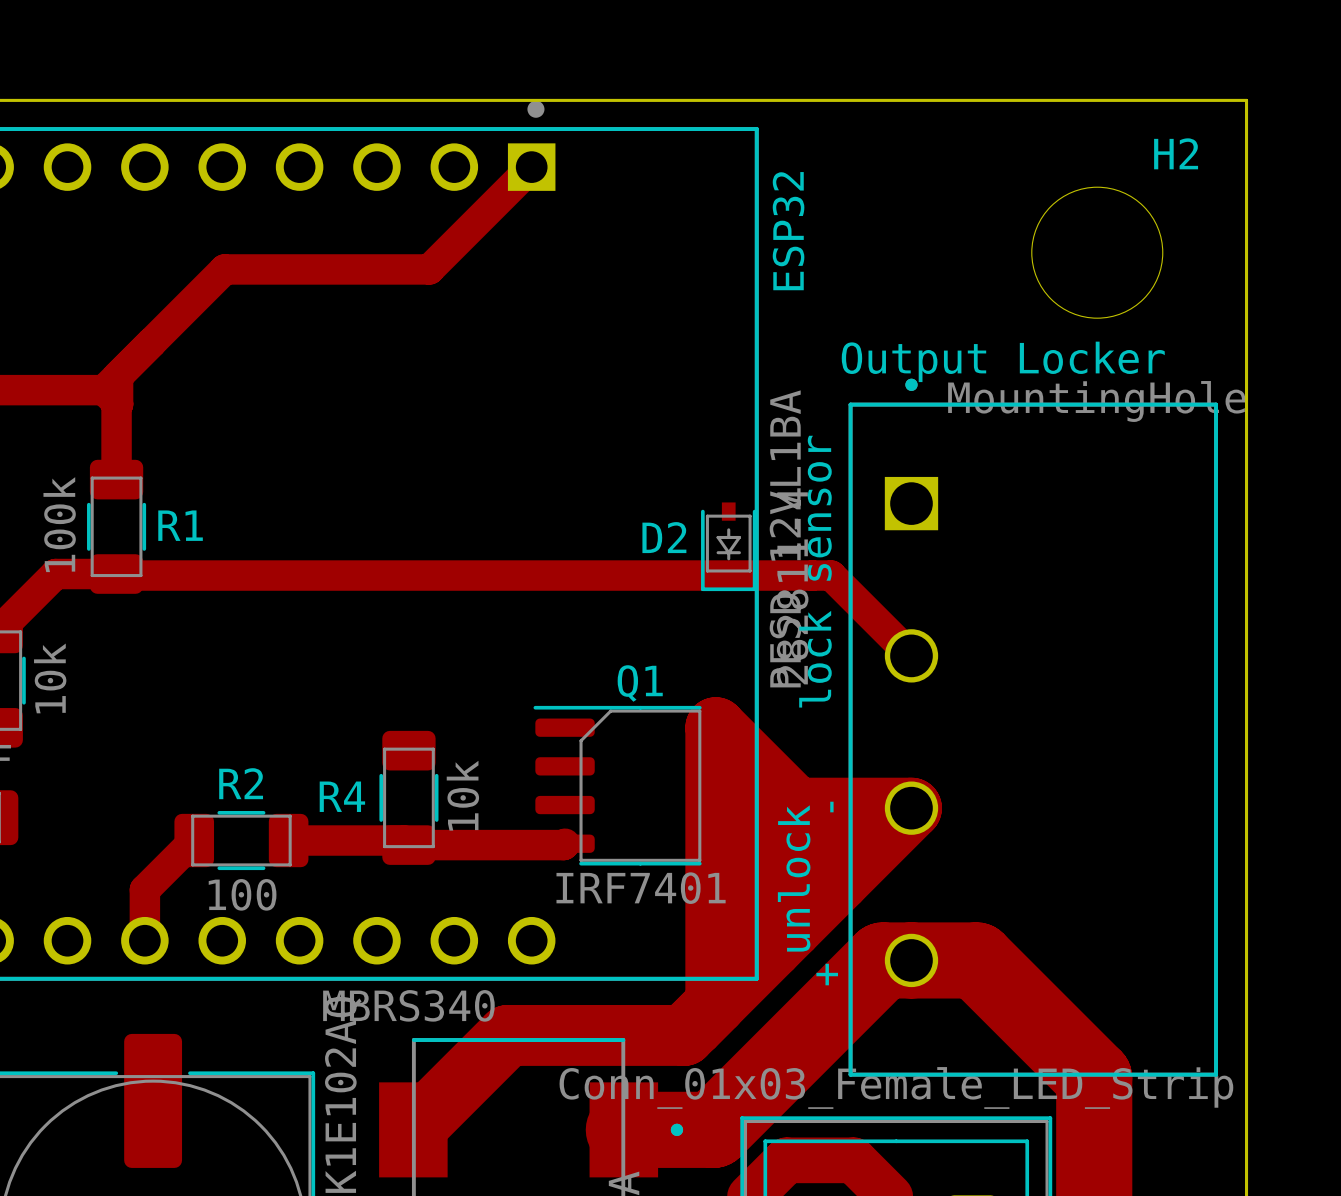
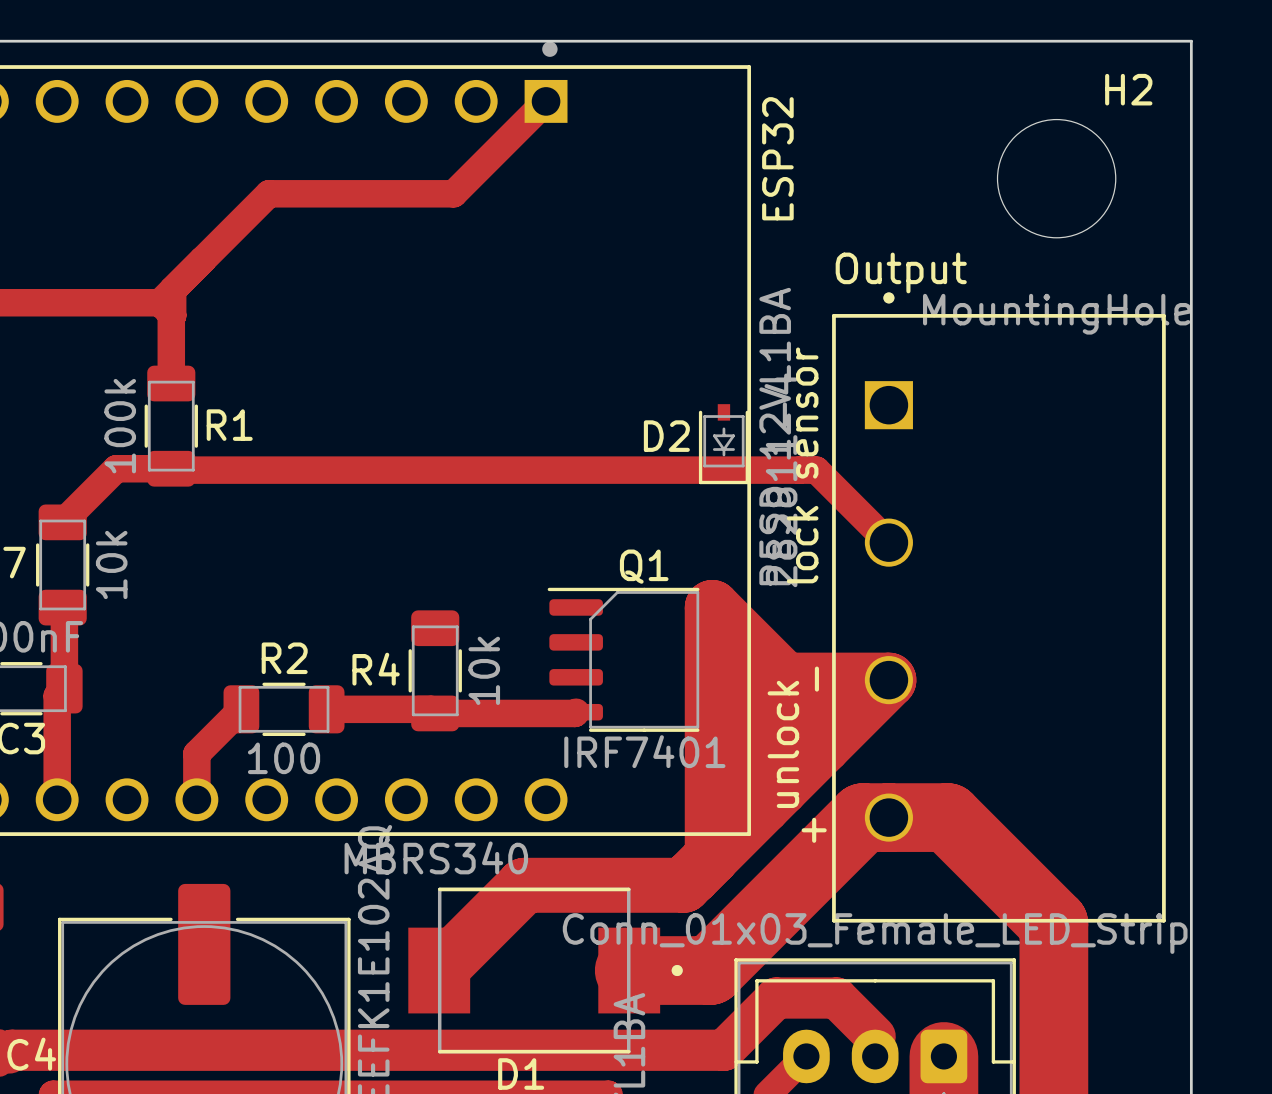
text: Output Locker (1003, 361) -> Output (901, 272)

